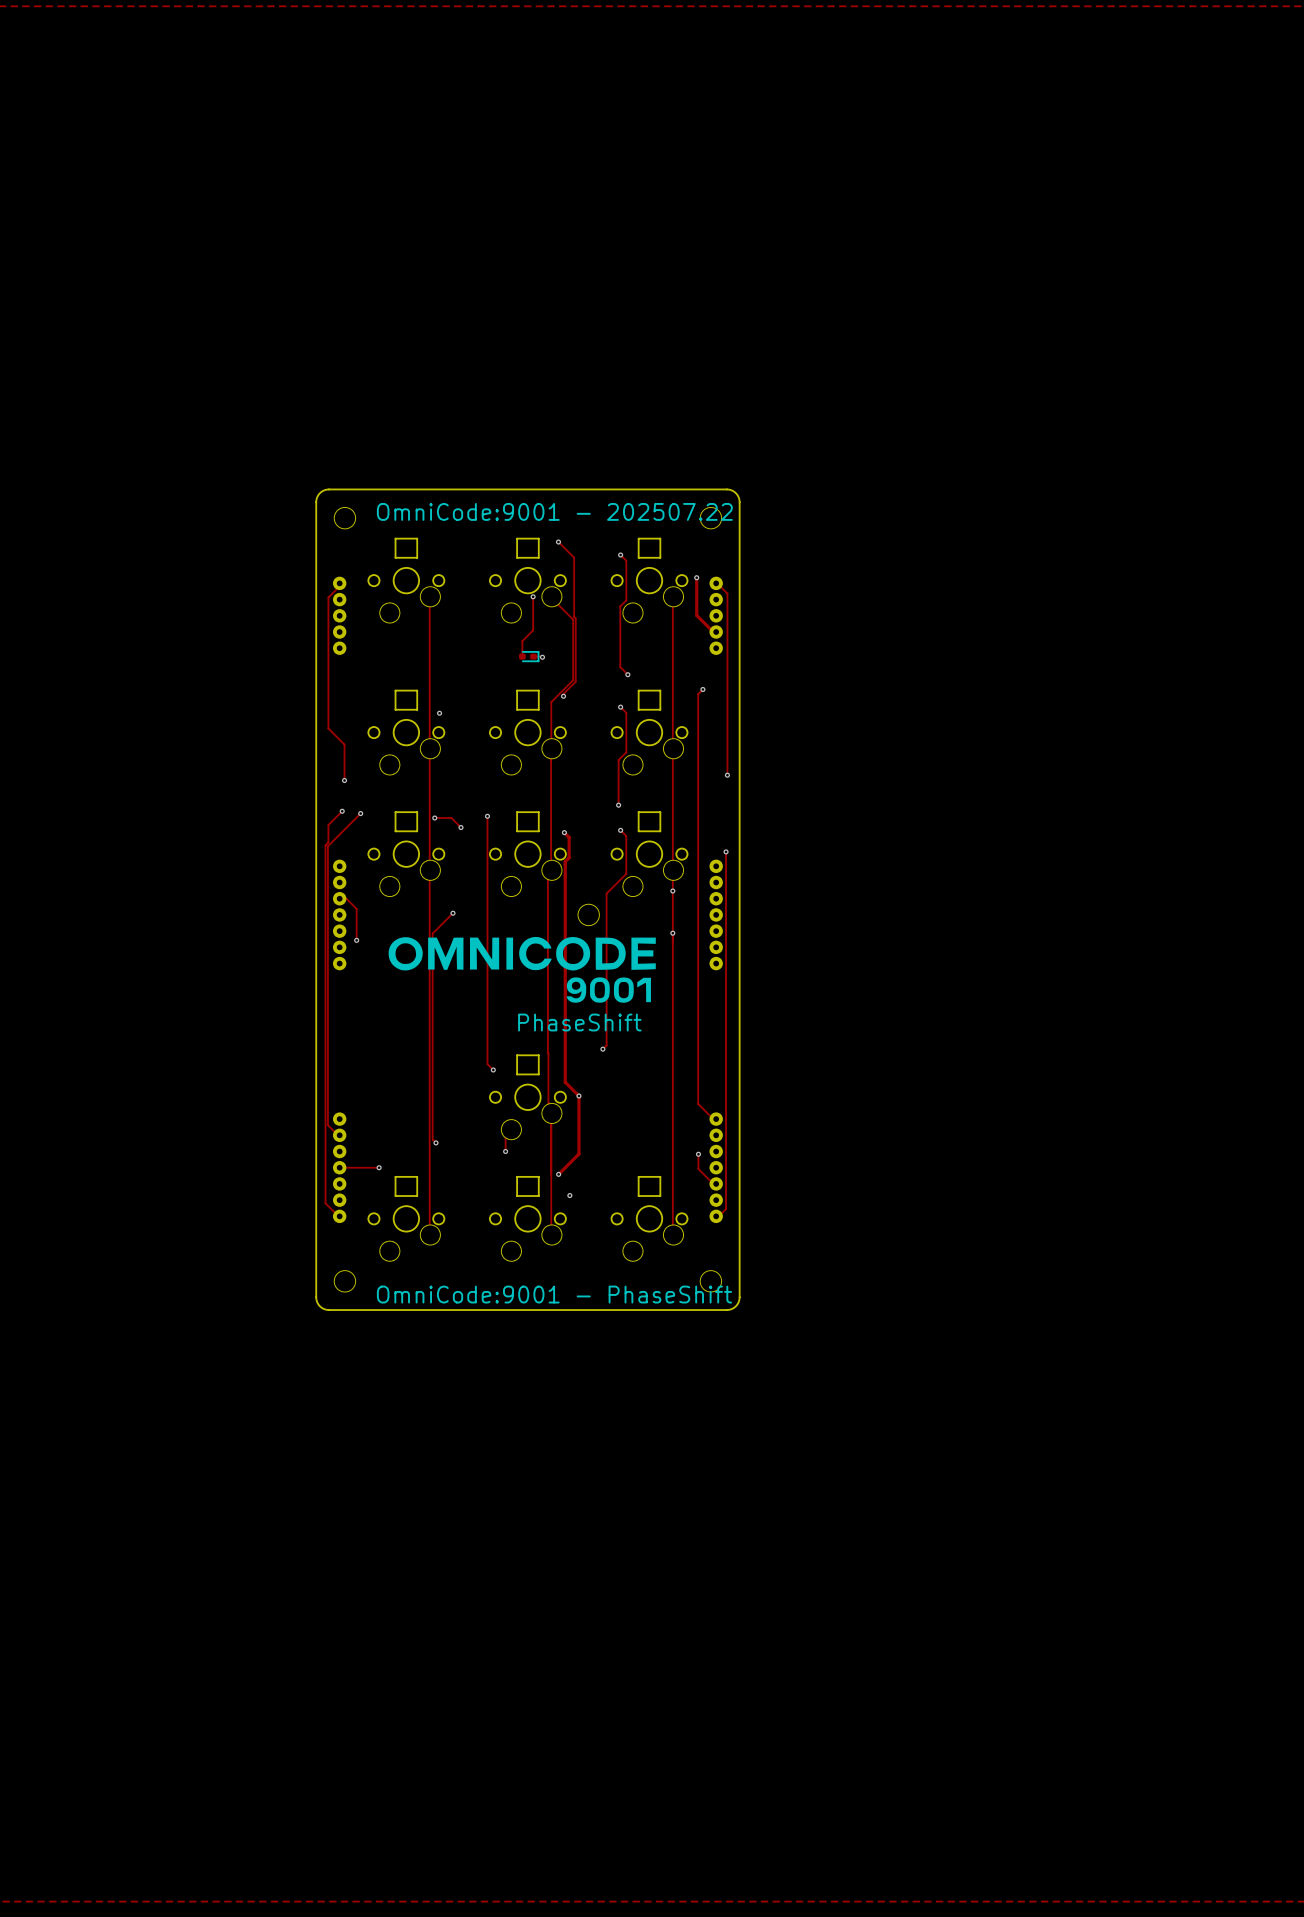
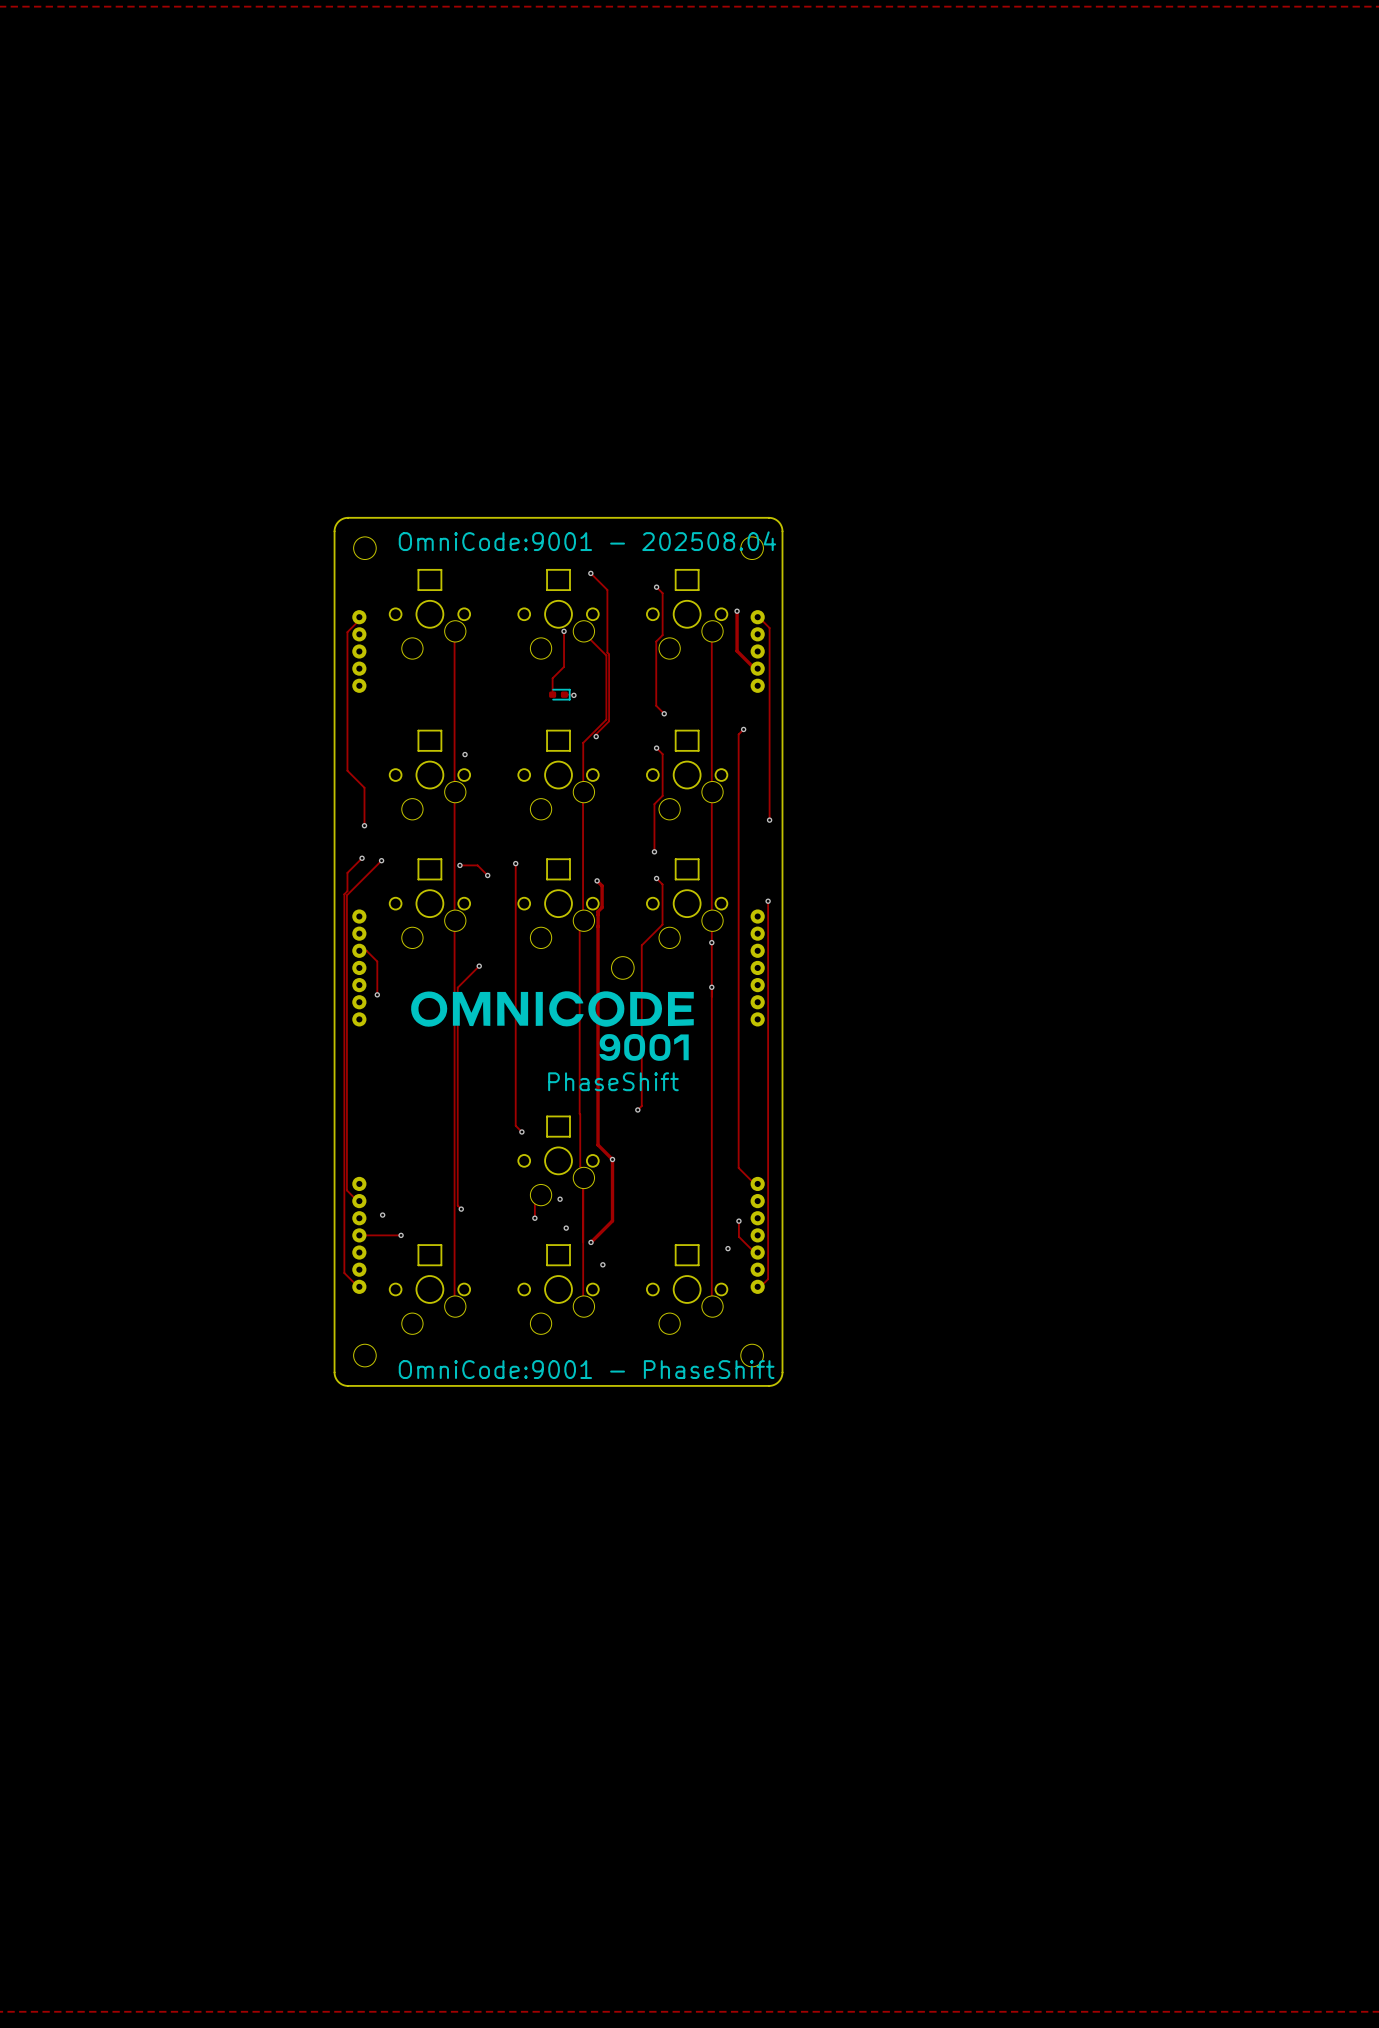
text: OmniCode:9001 - 202507.22 (554, 511) -> OmniCode:9001 - 202508.04 (587, 541)
via: none -> (560, 1199)
via: none -> (382, 1215)
via: none -> (566, 1228)
via: none -> (727, 1248)

